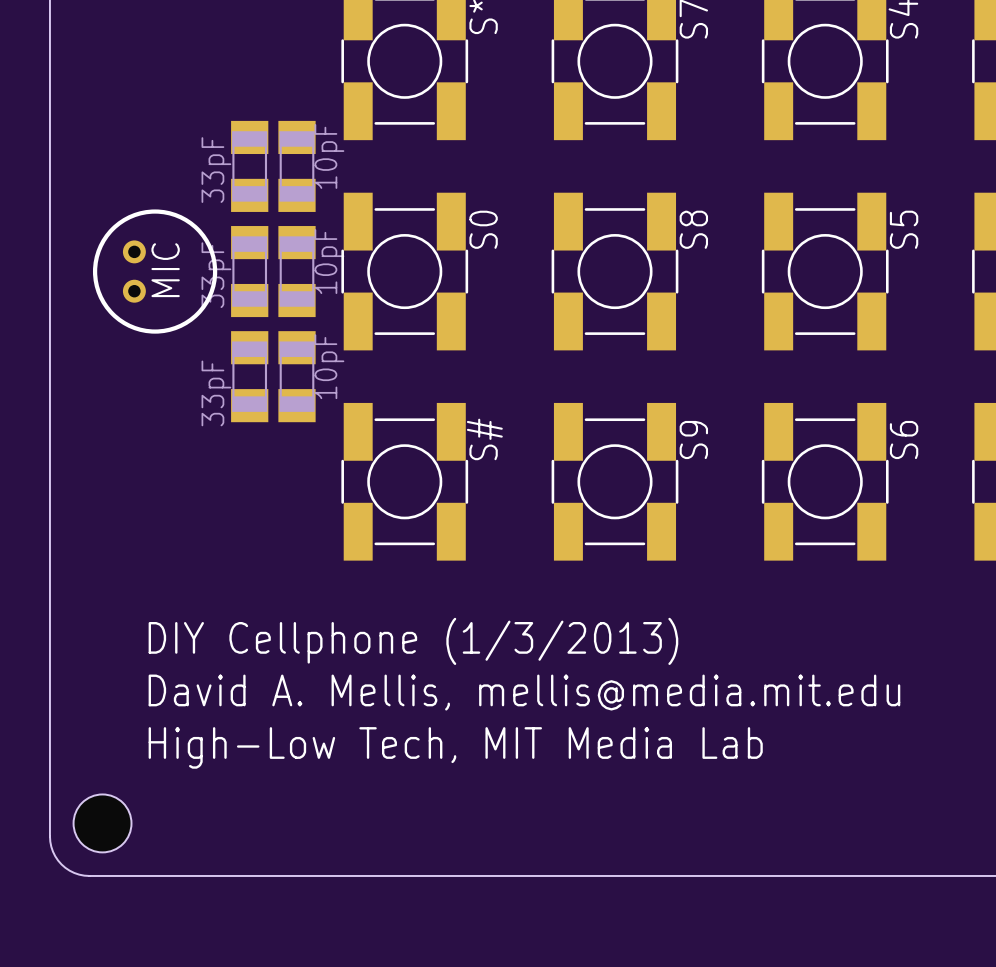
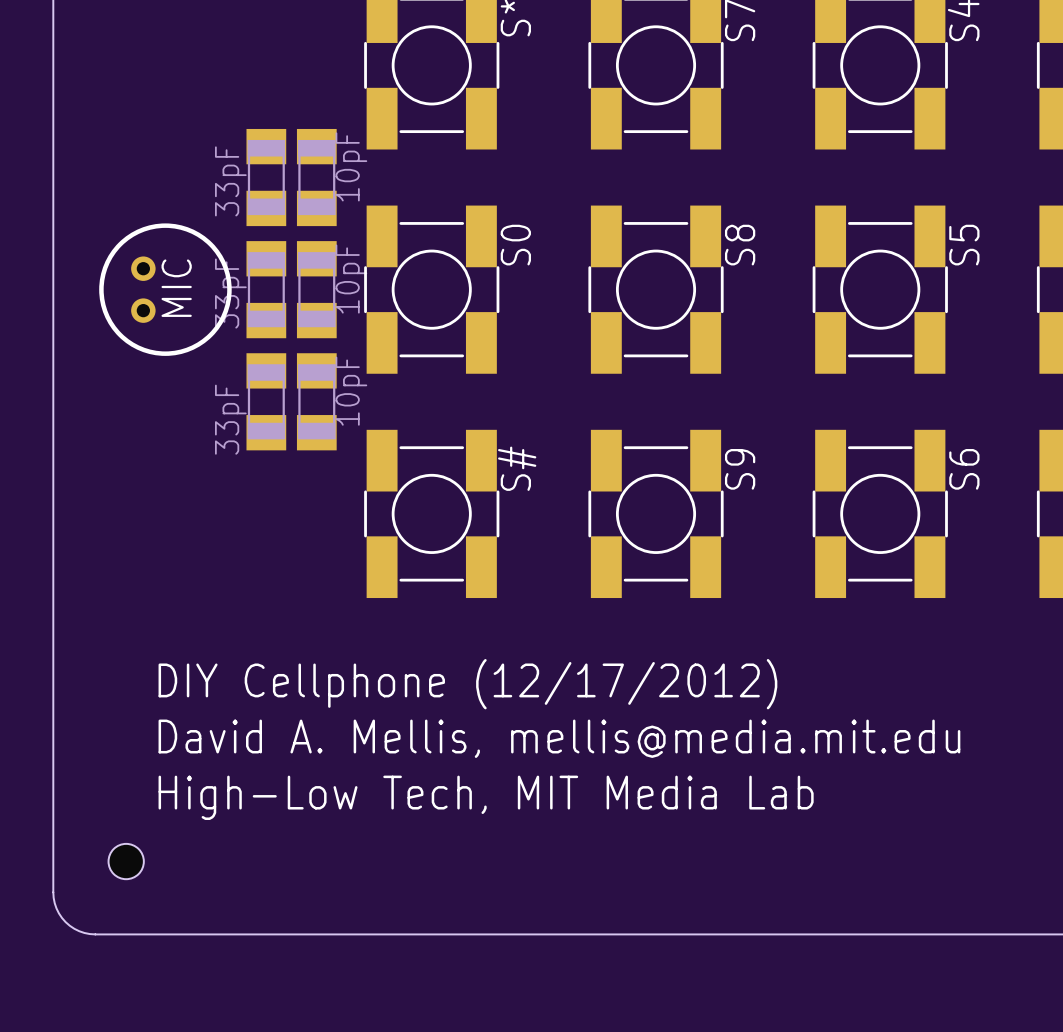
text: DIY Cellphone (1/3/2013) (413, 641) -> DIY Cellphone (12/17/2012) (467, 684)
hole: none -> (126, 861)
hole: (102, 823) -> none

